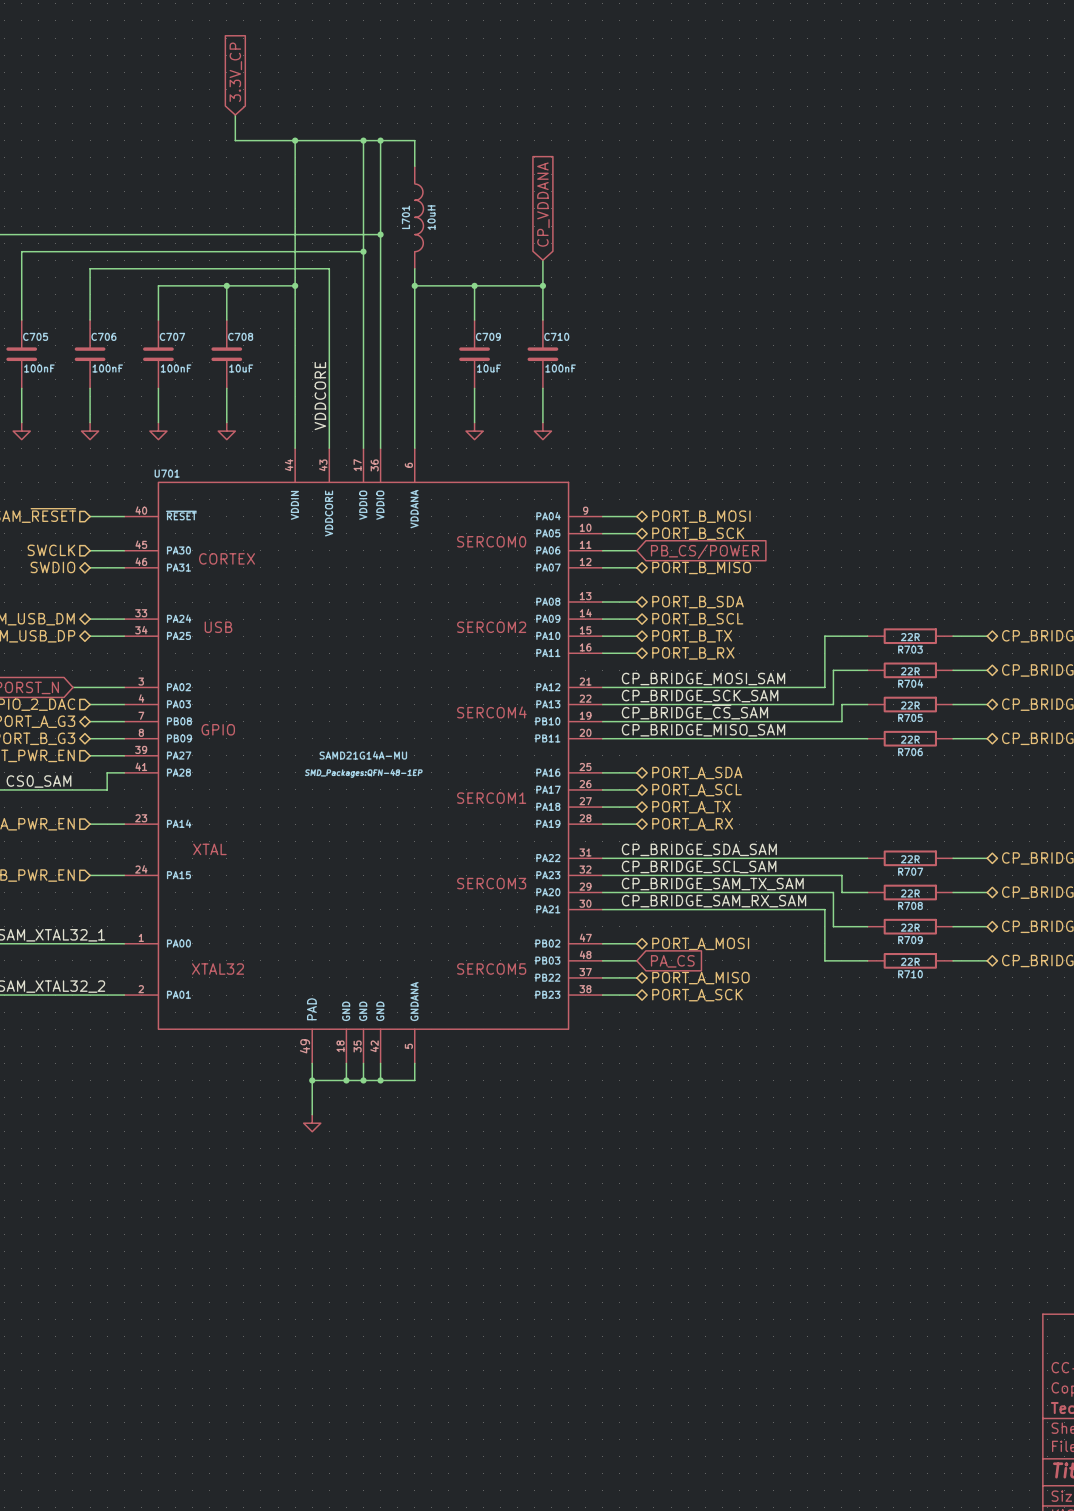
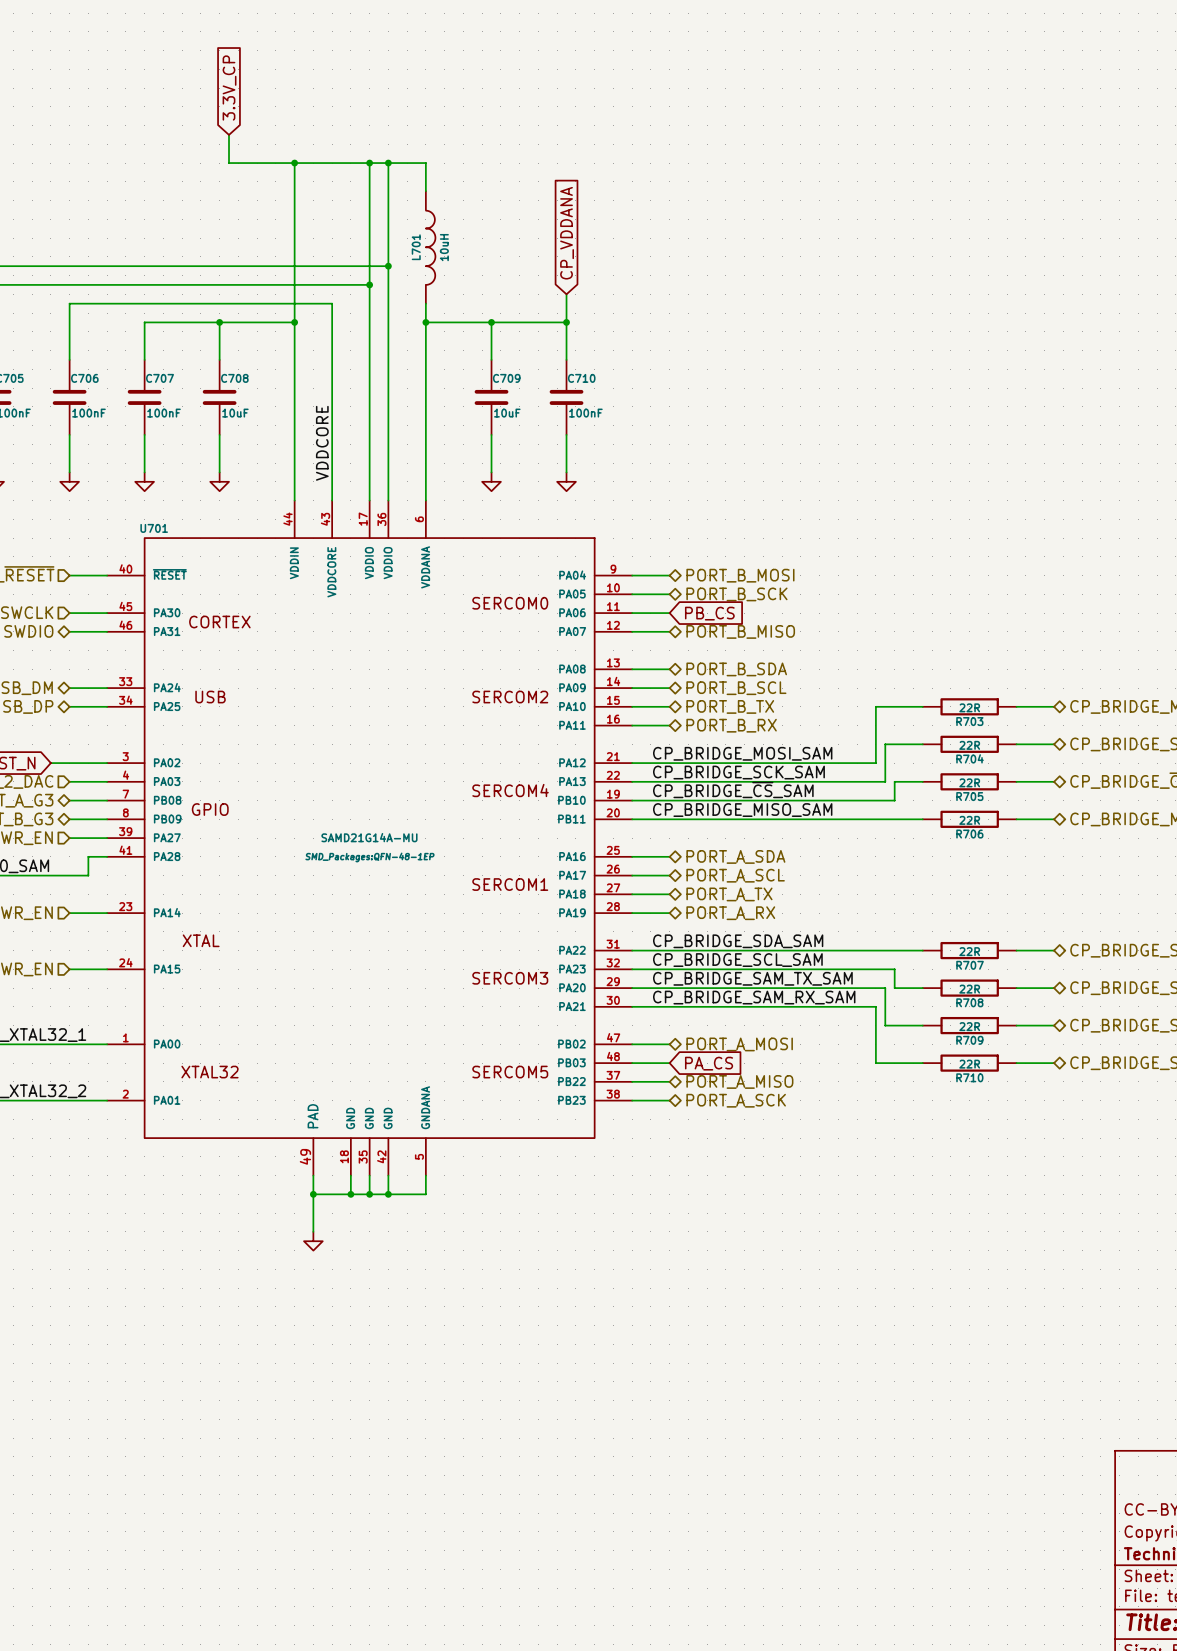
global label: PB_CS/POWER (705, 551) -> PB_CS (709, 613)

